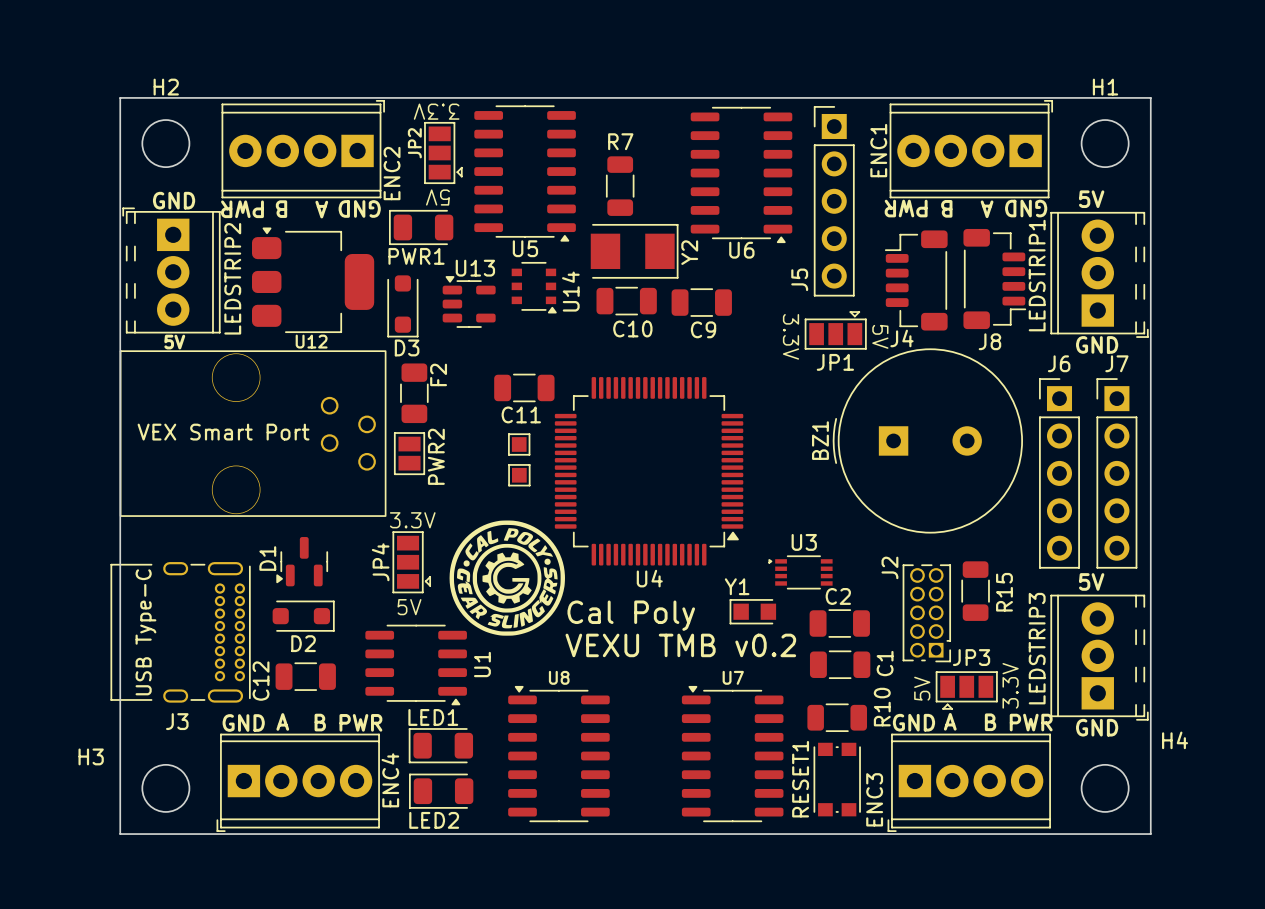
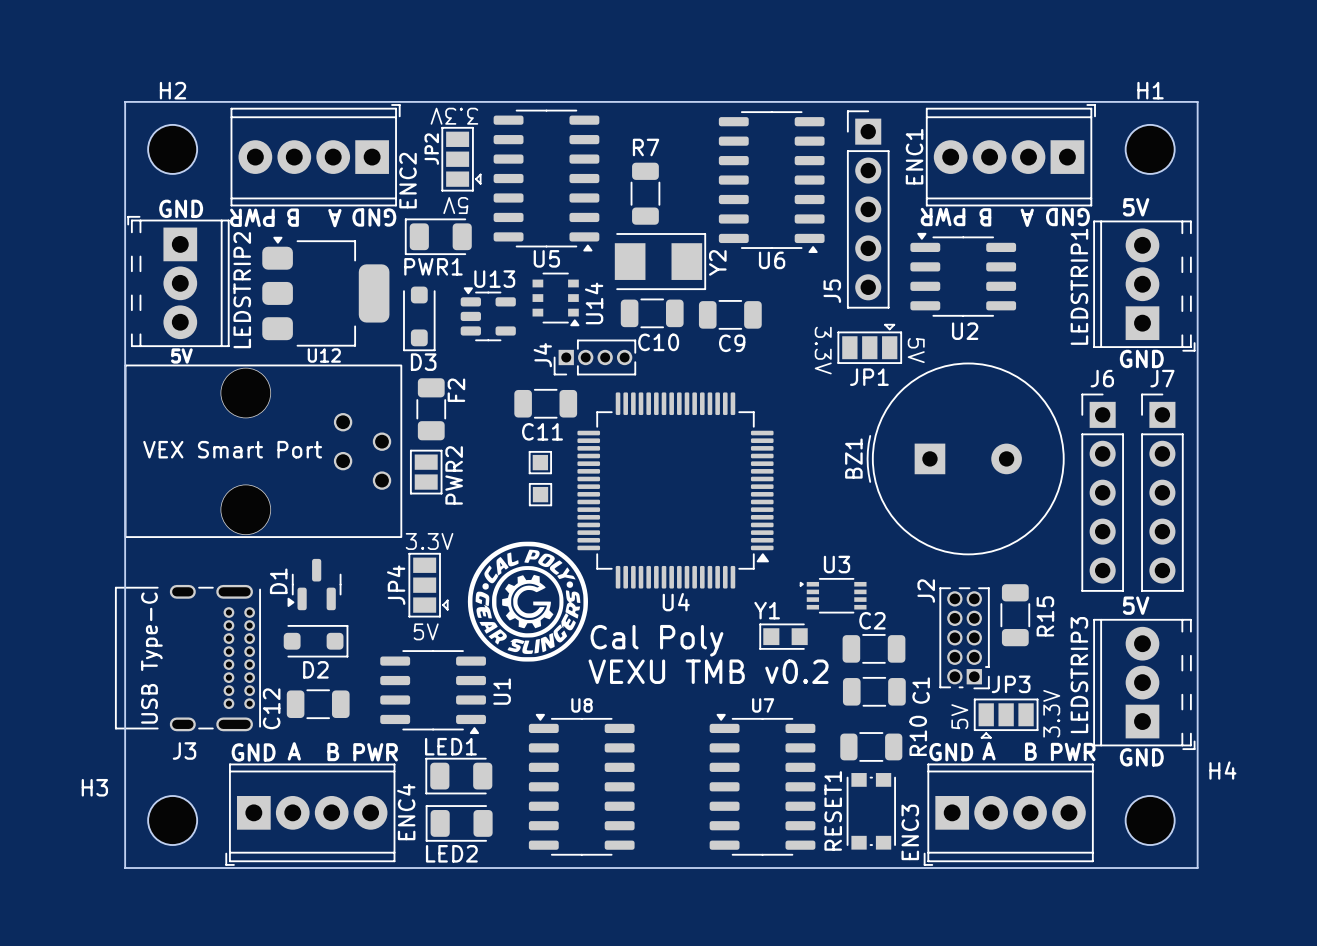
J4 footprint: [884, 230, 948, 331] -> [553, 339, 637, 376]
U2: none -> (963, 274)
J8: (994, 279) -> none
J4 name position: J4 (901, 338) -> J4 (542, 355)

